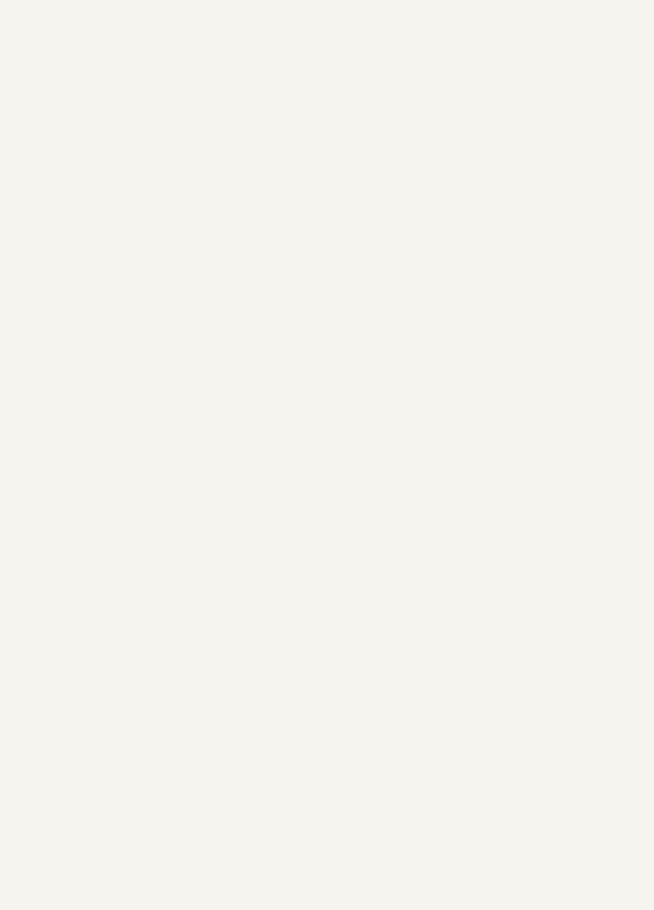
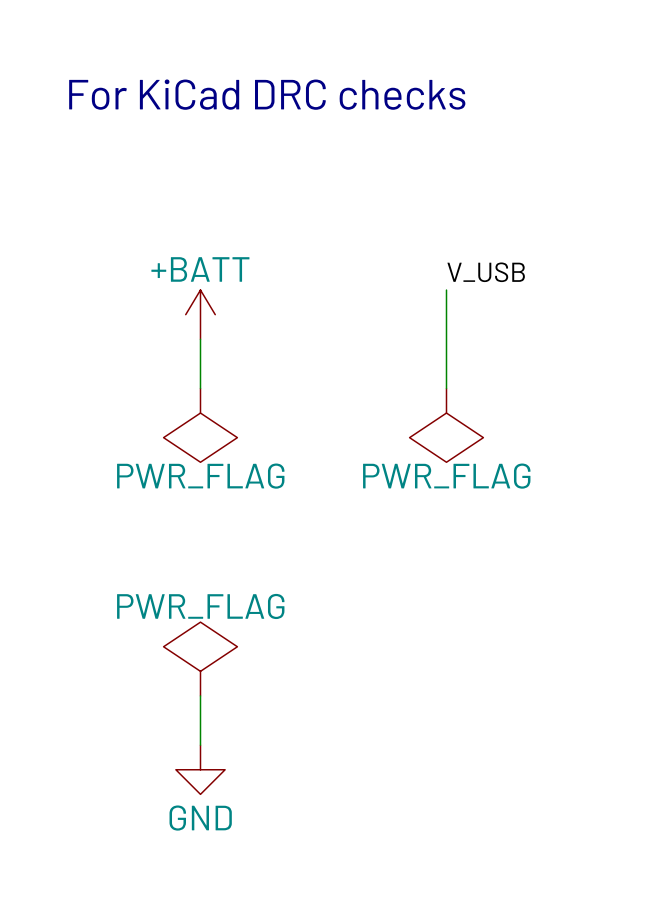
text: none -> For KiCad DRC checks (267, 94)
label: none -> V_USB (486, 272)
wire: none -> (446, 290) (446, 388)
power symbol: none -> +BATT (200, 314)
wire: none -> (200, 339) (200, 388)
power symbol: none -> PWR_FLAG (200, 425)
power symbol: none -> PWR_FLAG (446, 425)
power symbol: none -> PWR_FLAG (200, 659)
wire: none -> (200, 695) (200, 745)
power symbol: none -> GND (200, 769)

